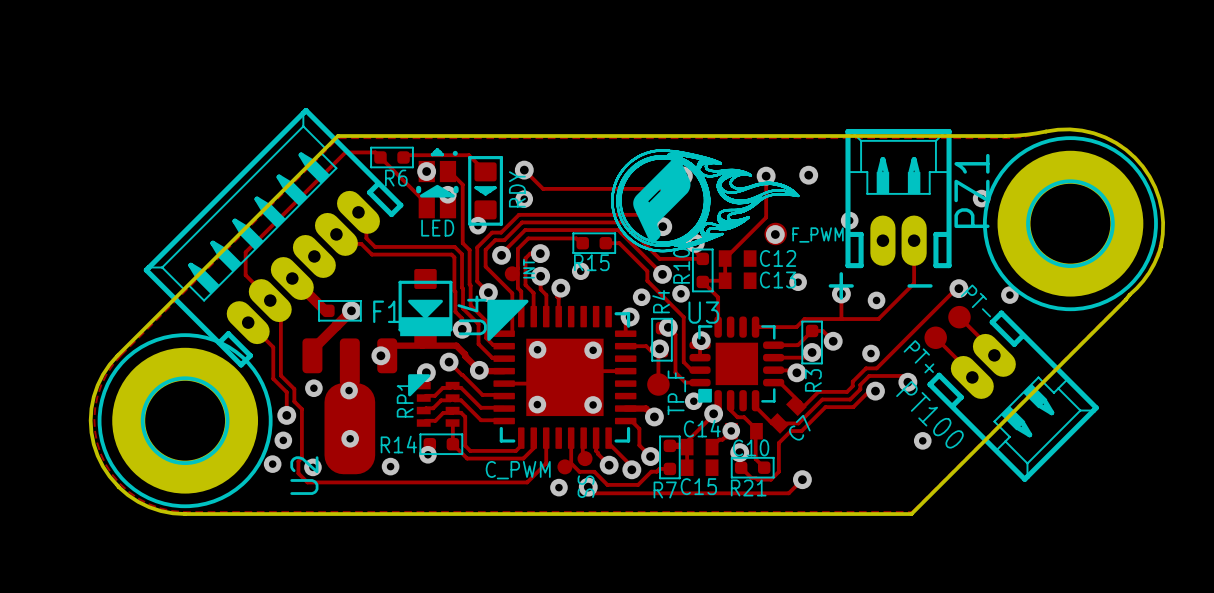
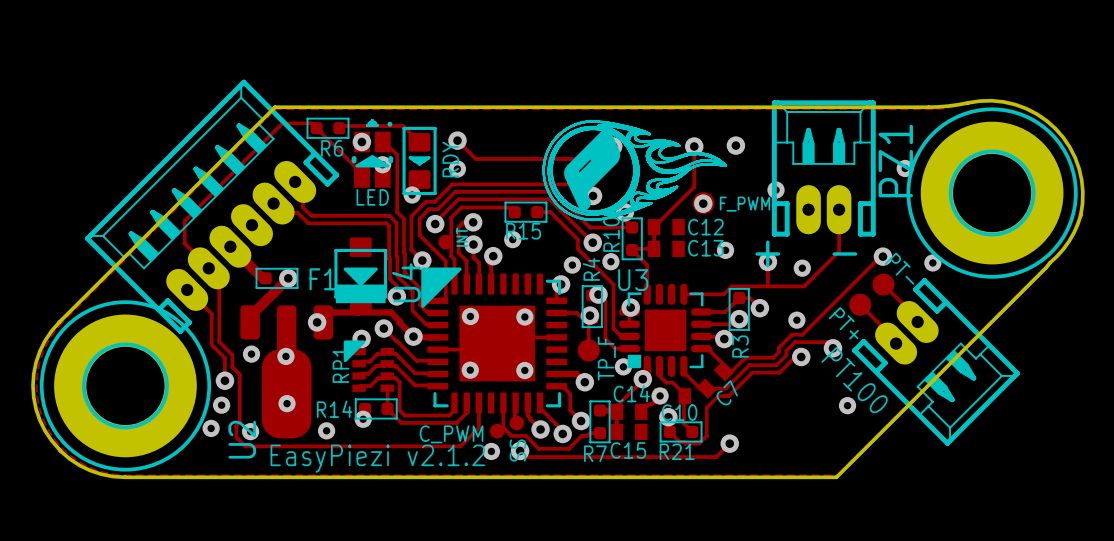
text: none -> EasyPiezi v2.1.2 (377, 458)

